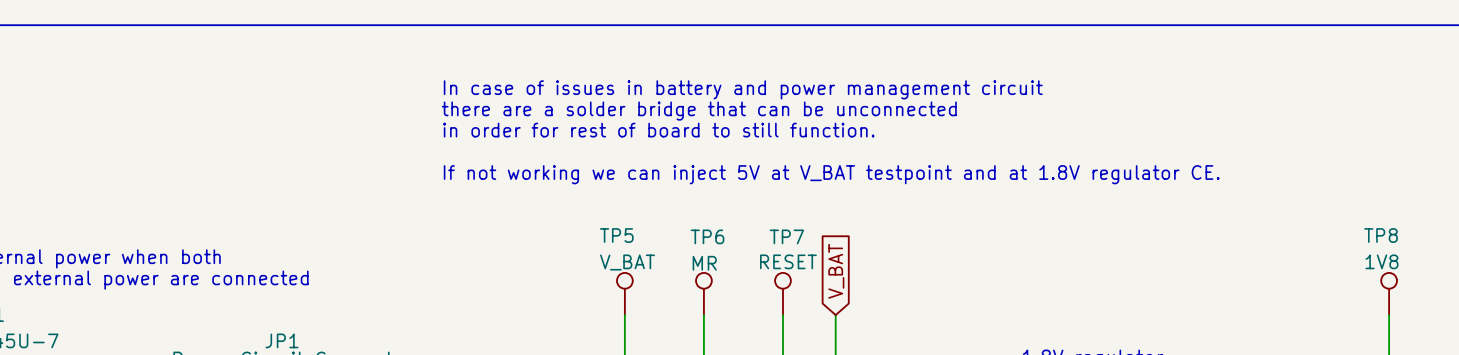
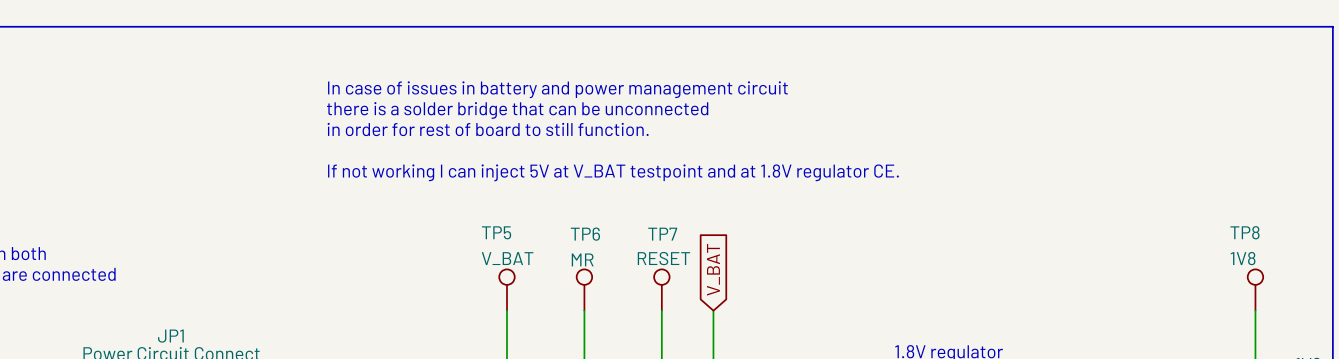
text: there are a solder bridge that can be unconnected (699, 111) -> there is a solder bridge that can be unconnected (517, 110)
text: If not working we can inject 5V at V_BAT testpoint and at 1.8V regulator CE. (831, 174) -> If not working I can inject 5V at V_BAT testpoint and at 1.8V regulator CE. (613, 172)

